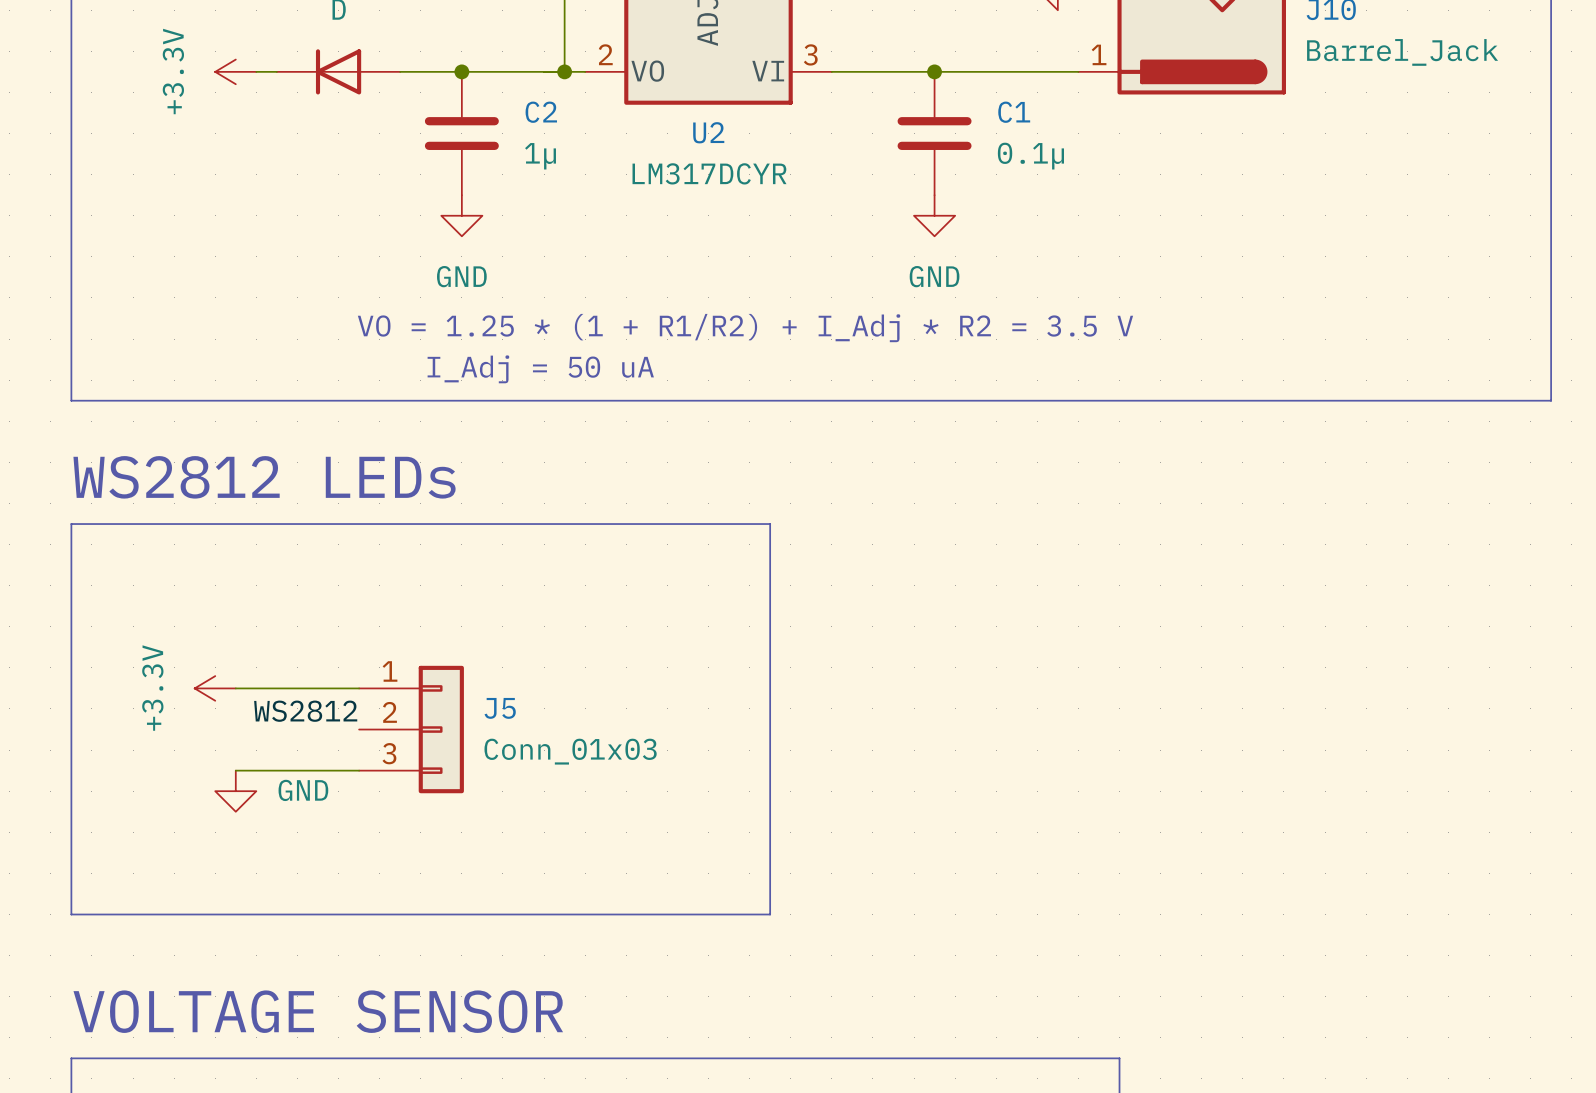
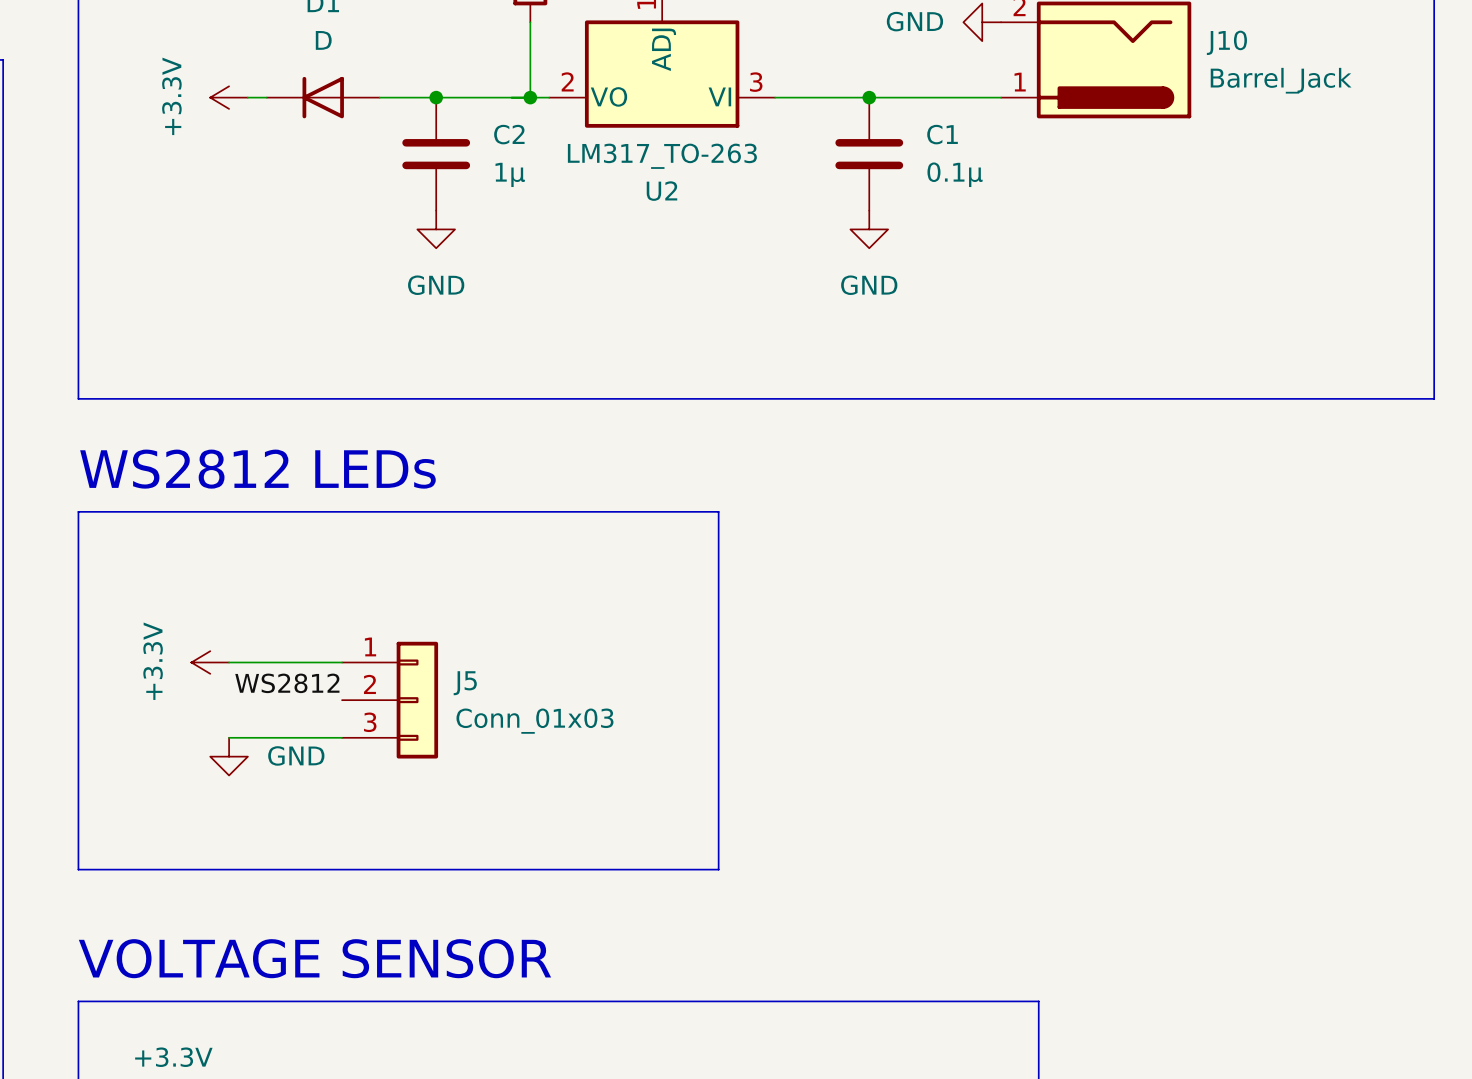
U2 name position: U2 (708, 132) -> U2 (661, 191)
U2 value: LM317DCYR (709, 173) -> LM317_TO-263 (662, 156)
text: VO = 1.25 * (1 + R1/R2) + I_Adj * R2 = 3.5 V (745, 328) -> none
text: I_Adj = 50 uA (540, 369) -> none

